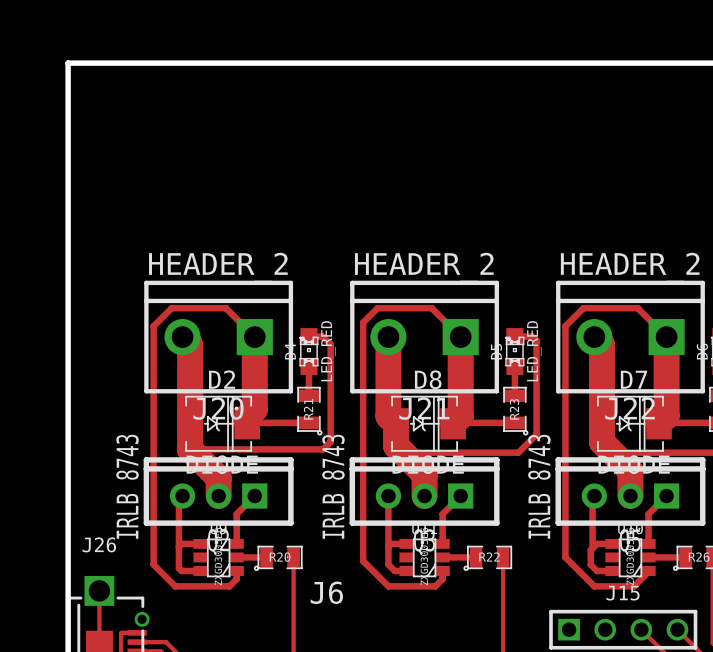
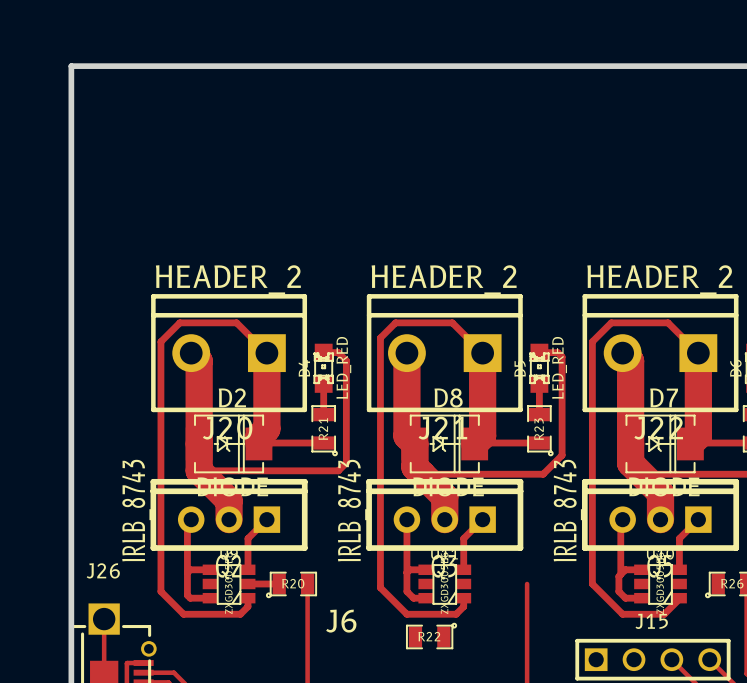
track: (442, 557) (476, 557) -> none
track: (648, 557) (685, 557) -> none
R22 rotation: 0° (487, 558) -> 180° (431, 636)
R22 position: (487, 558) -> (431, 636)

